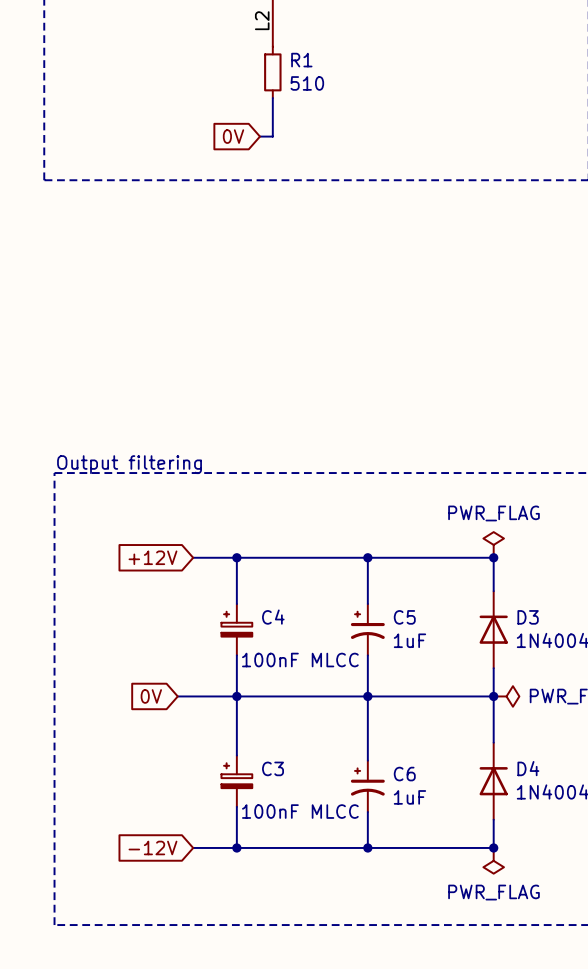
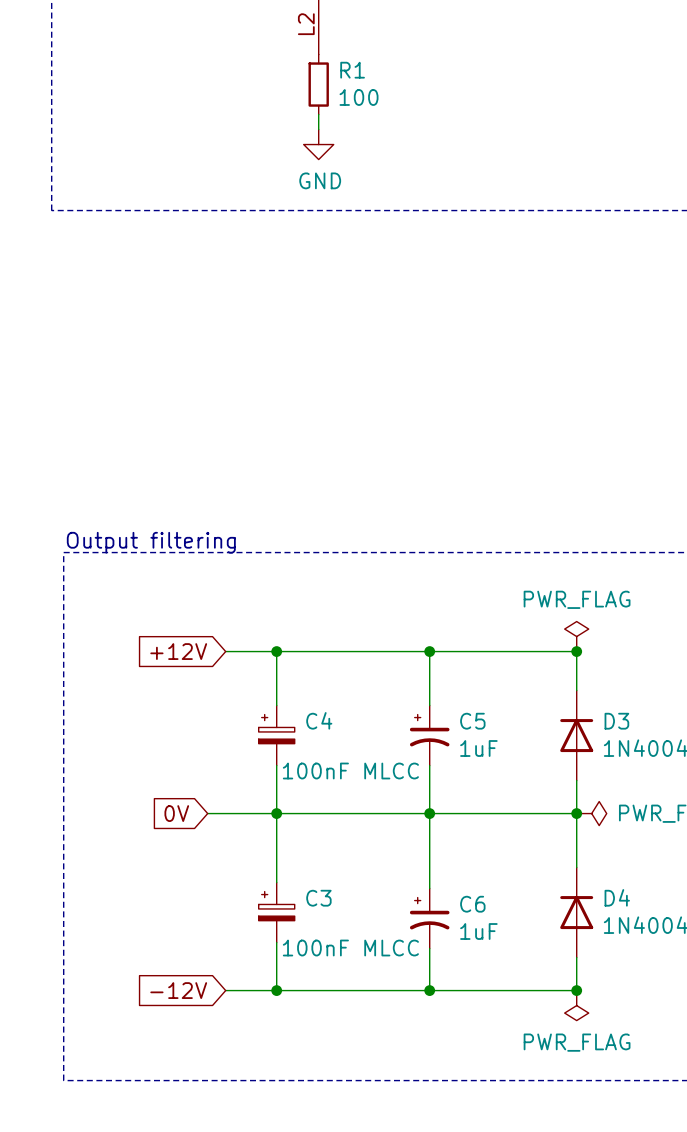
R1 value: 510 (307, 83) -> 100 (359, 97)
wire: (272, 110) (272, 136) (259, 136) -> none
power symbol: none -> GND (318, 144)
global label: 0V (233, 136) -> none

